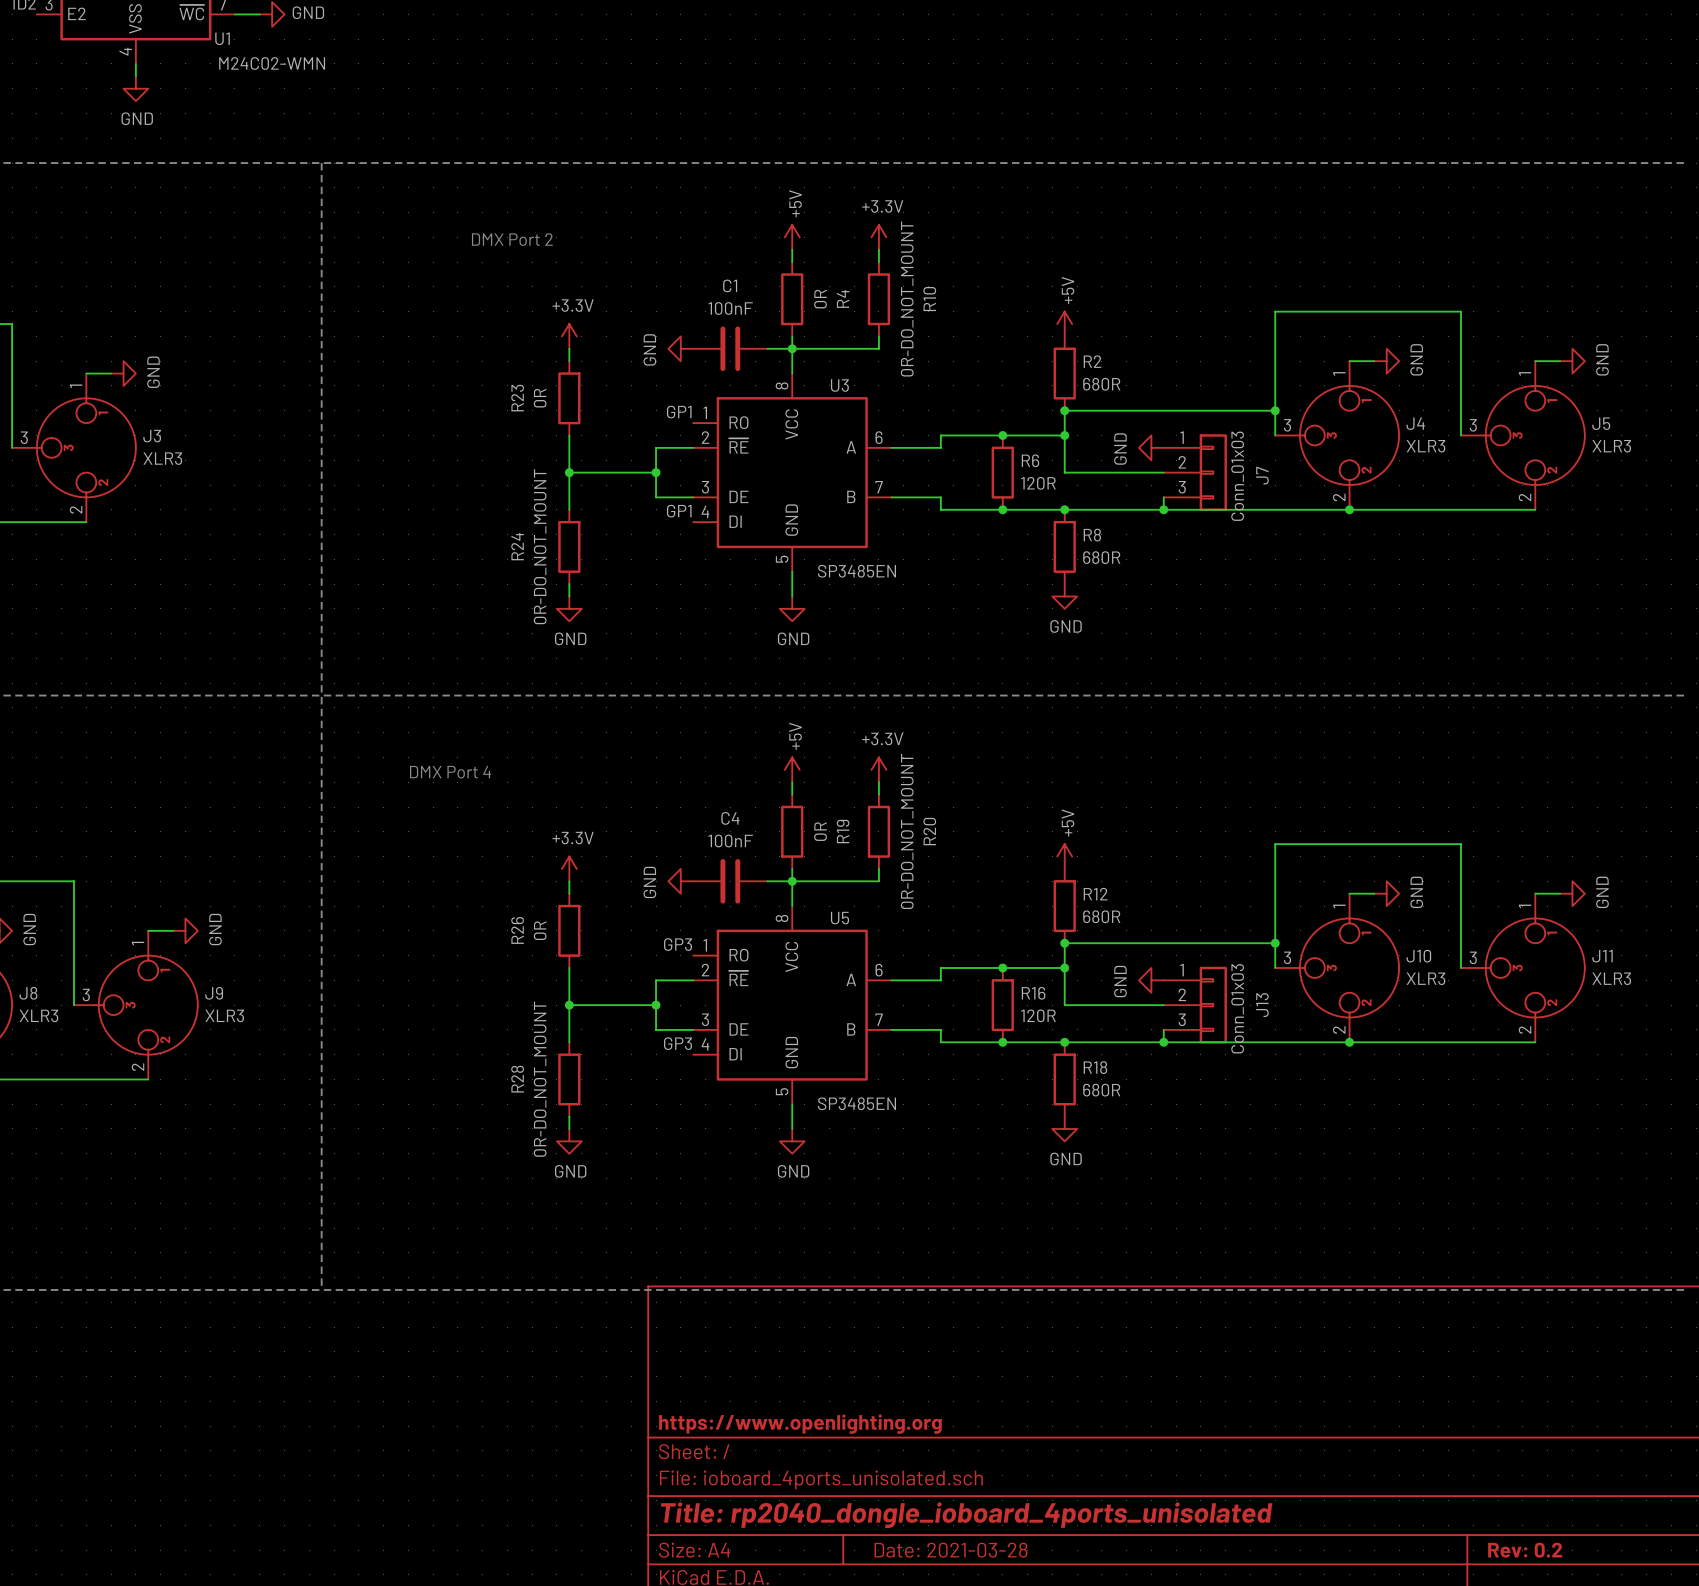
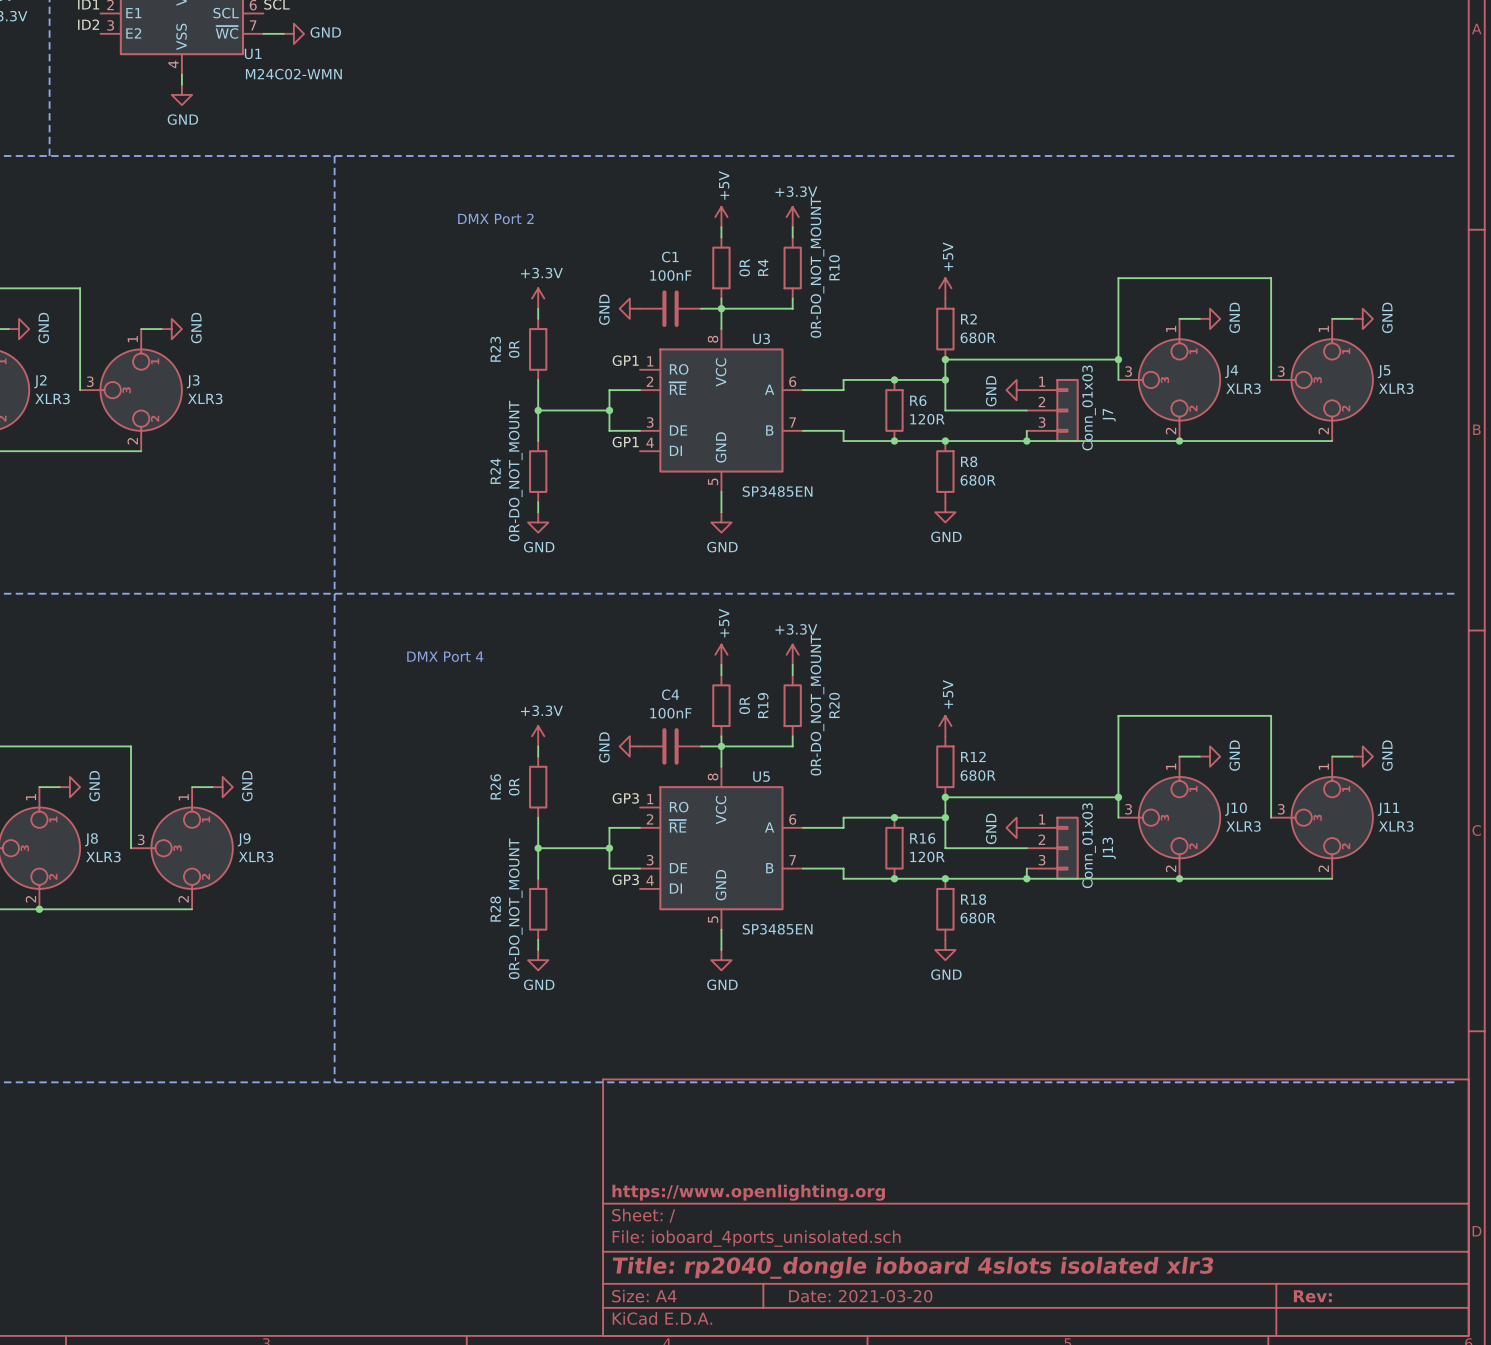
title block: Title: rp2040_dongle_ioboard_4ports_unisolated (966, 1515) -> Title: rp2040_dongle ioboard 4slots isolated xlr3 (913, 1267)
title block: Date: 2021-03-28 (950, 1550) -> Date: 2021-03-20 (860, 1296)
title block: Rev: 0.2 (1525, 1550) -> Rev: (1312, 1296)

